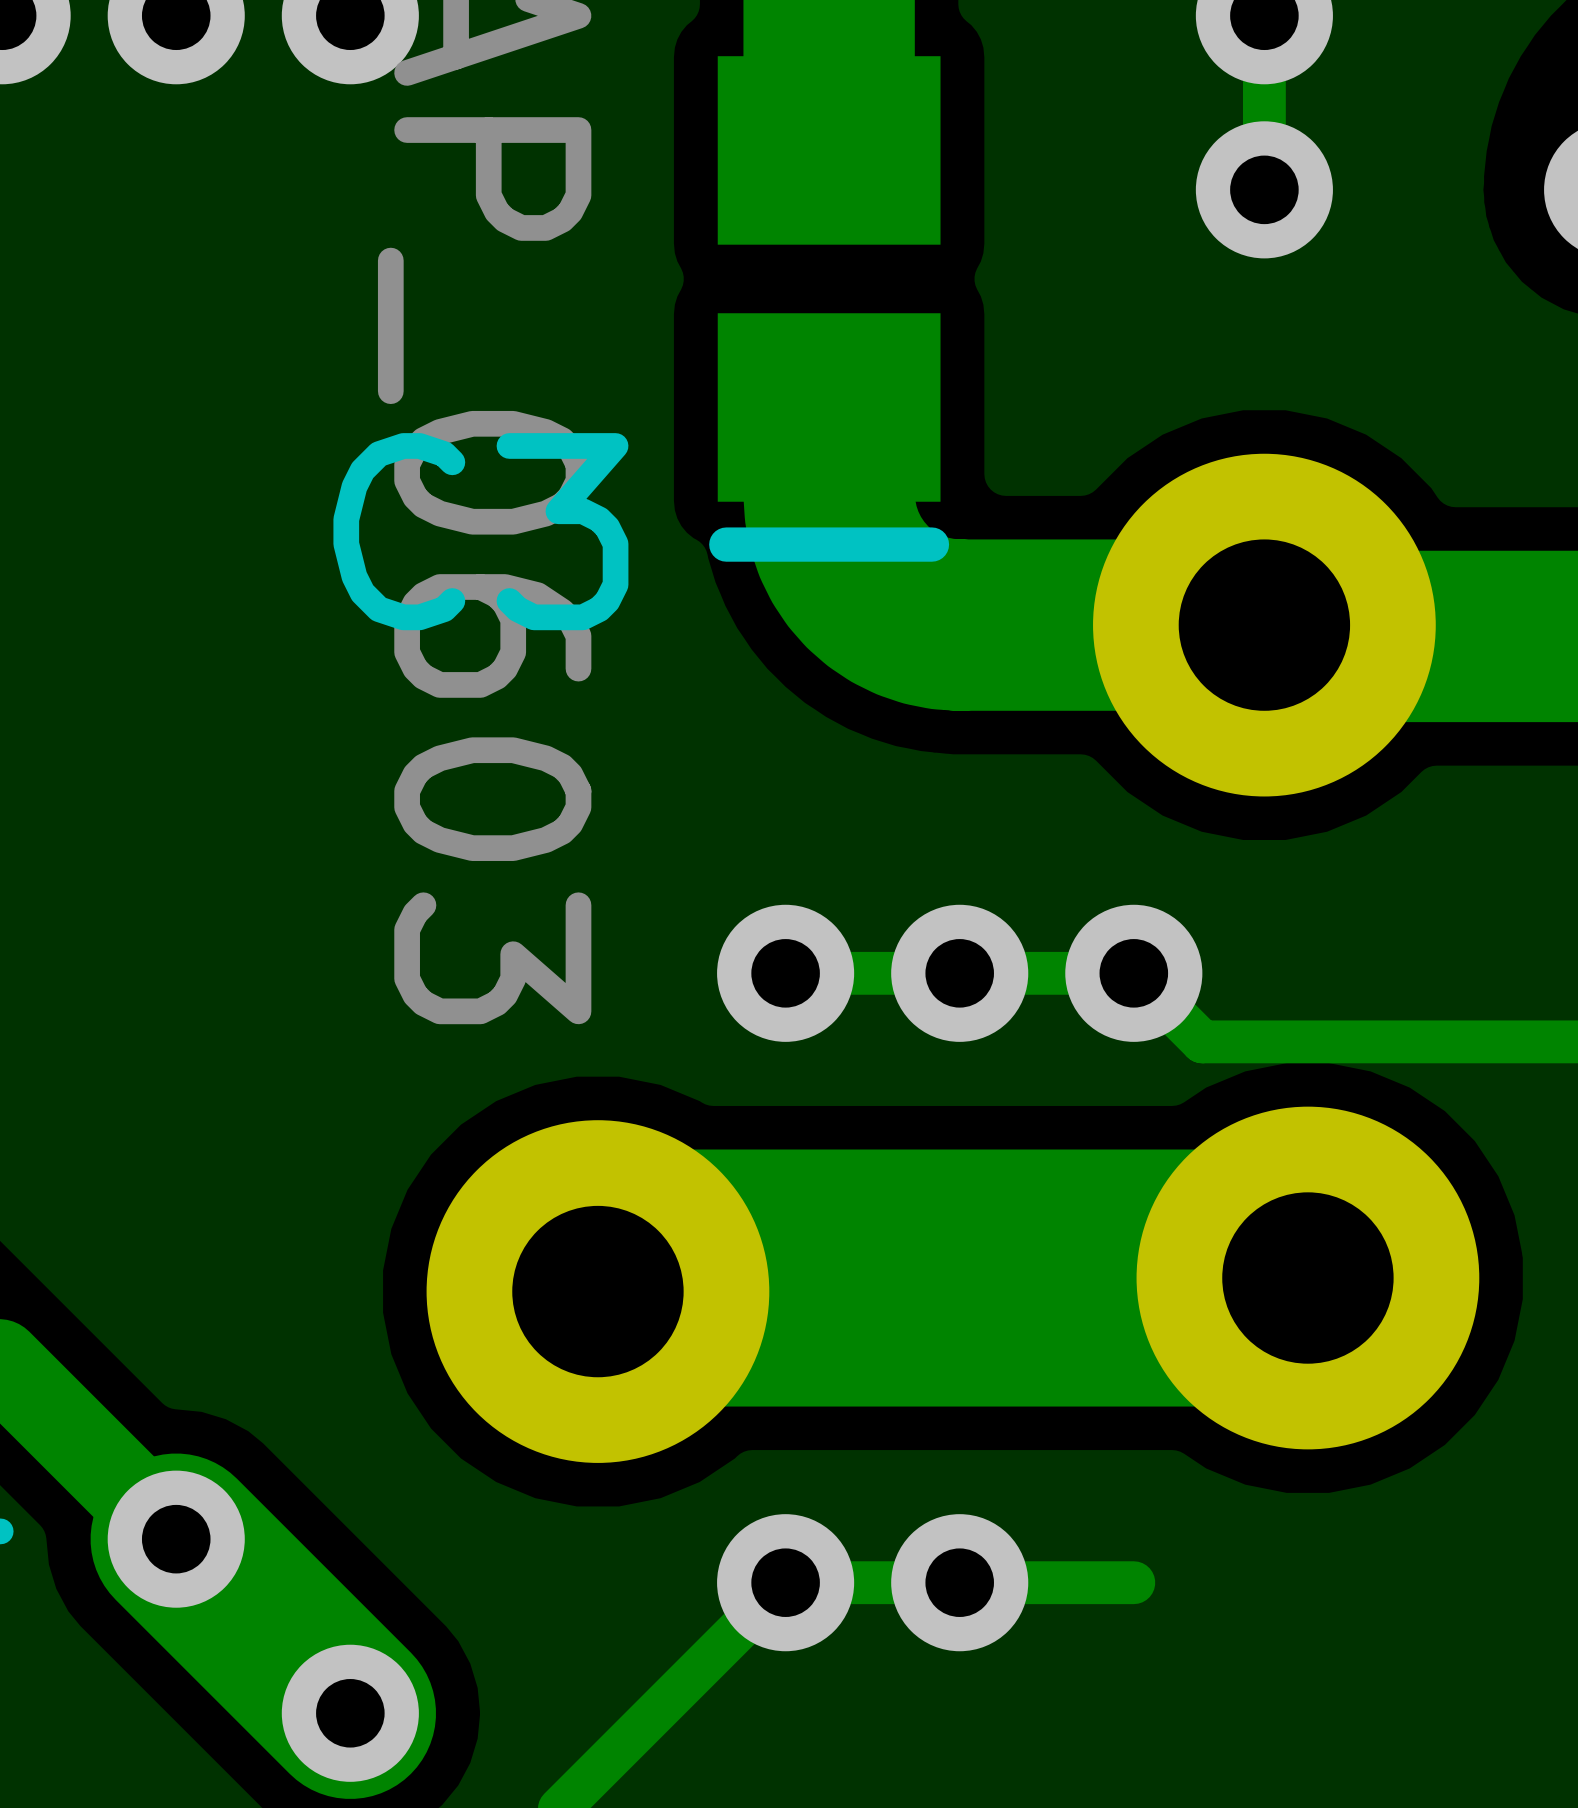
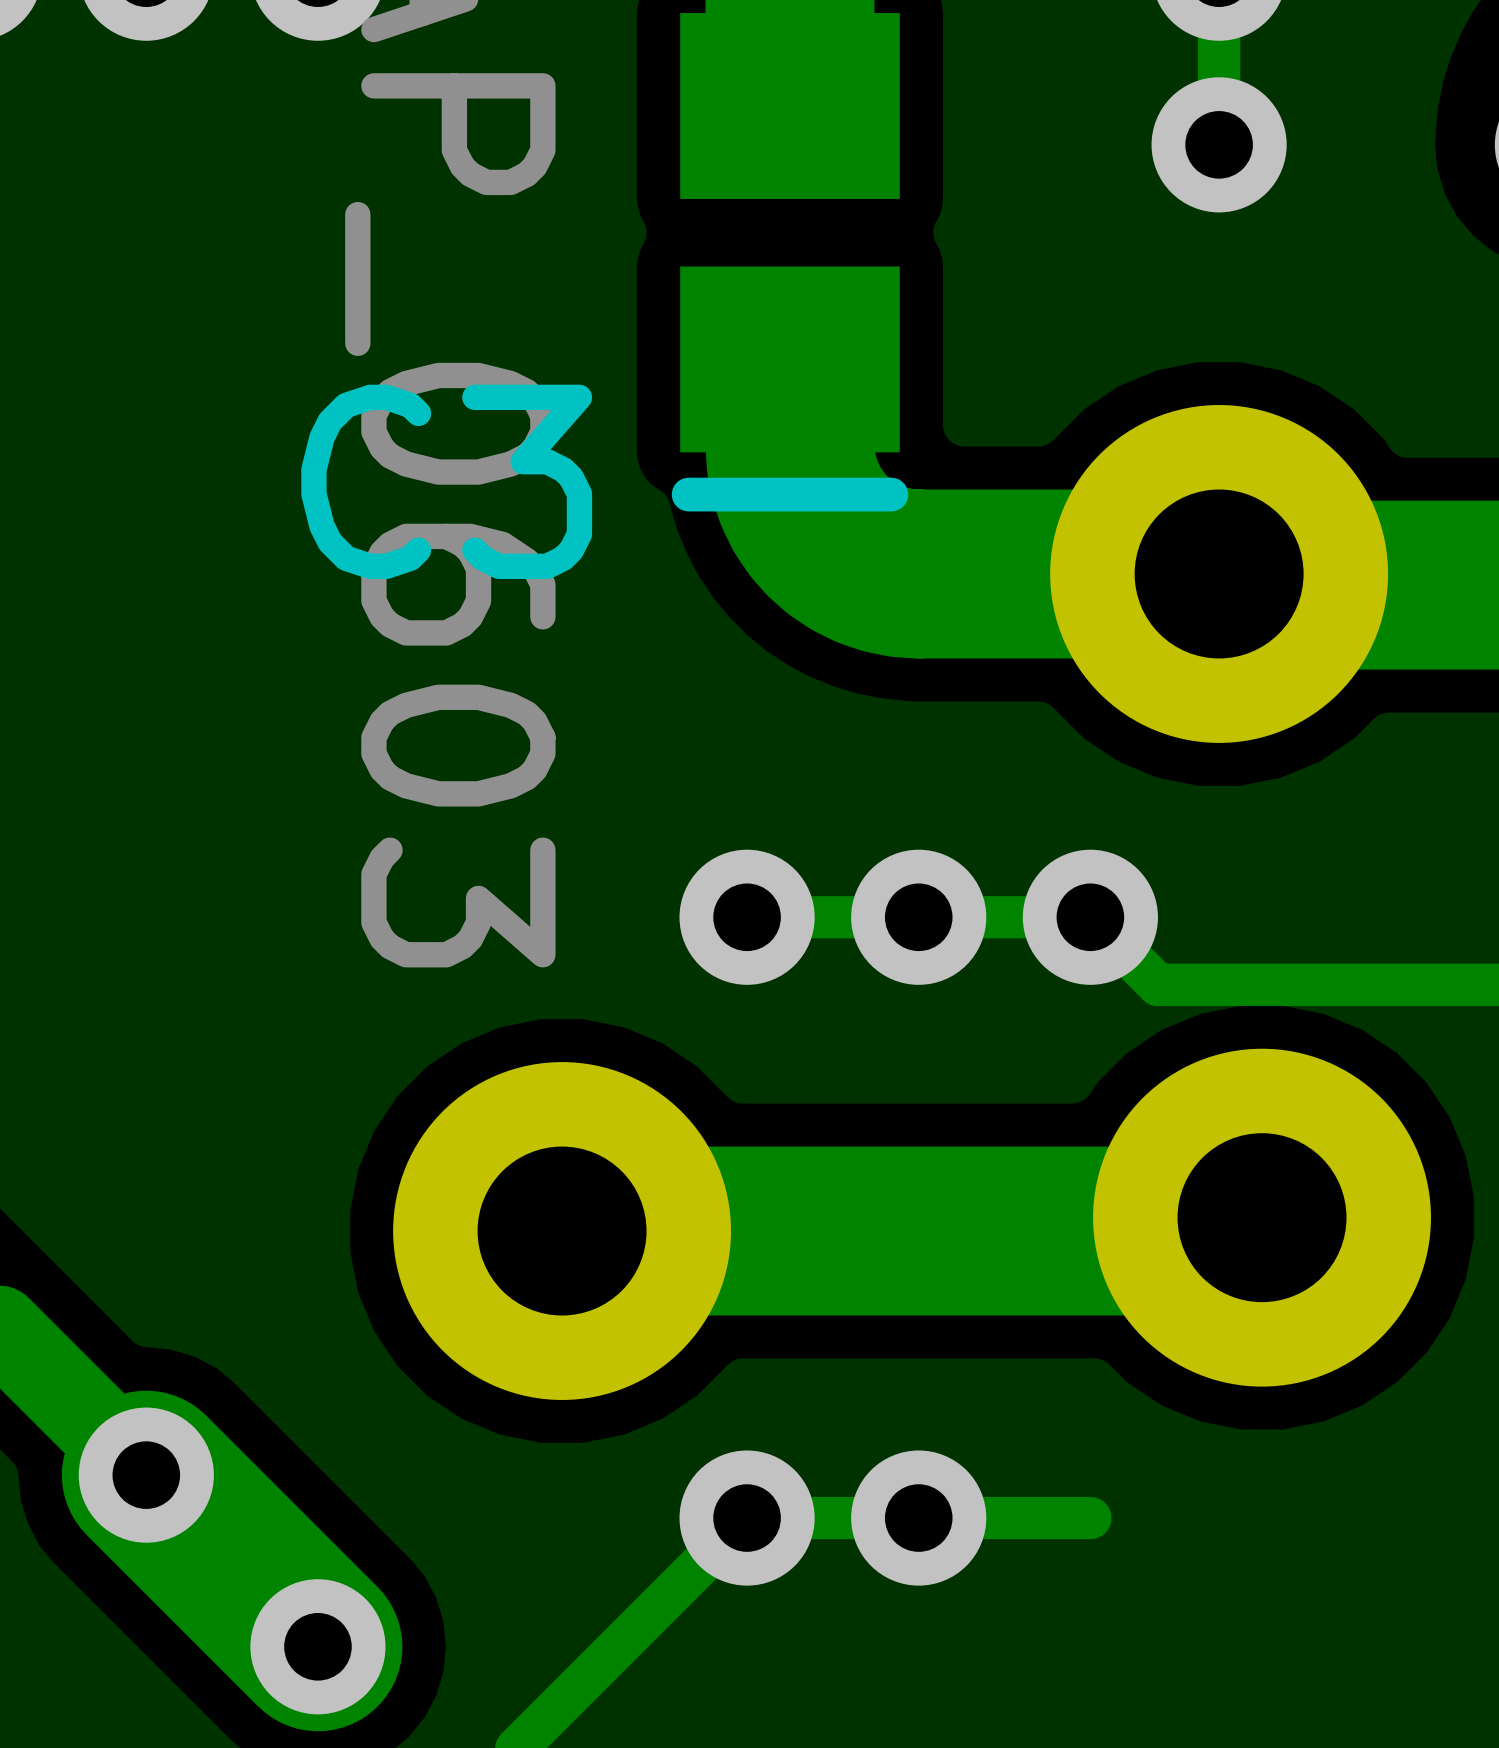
track: (1307, 1278) (611, 1278) -> (1248, 1231) (562, 1231)

